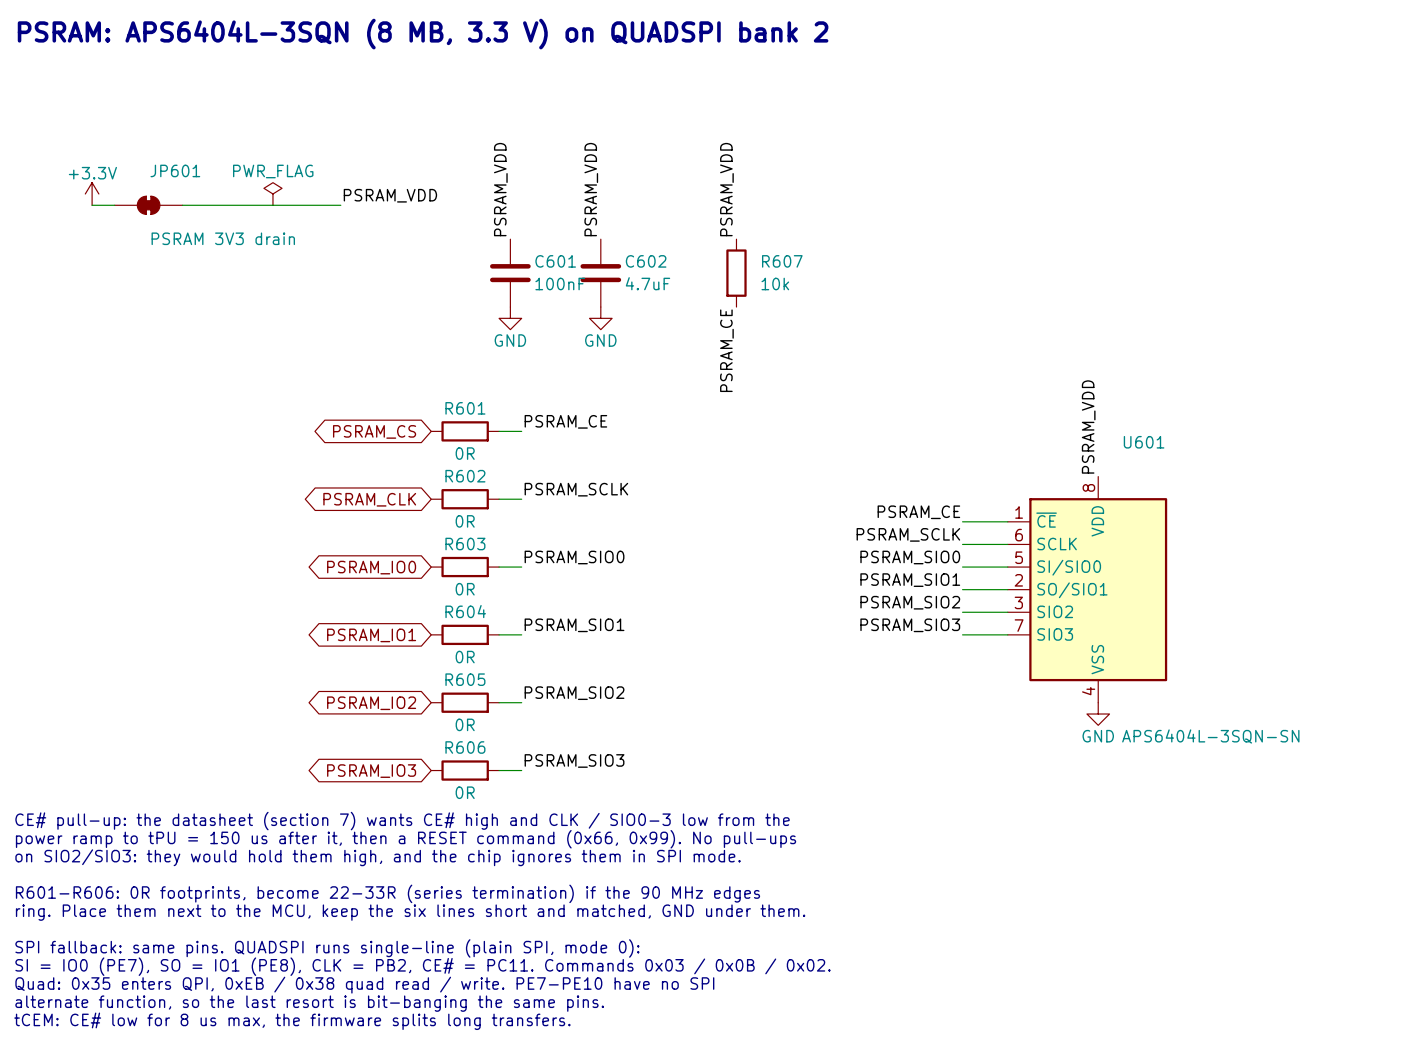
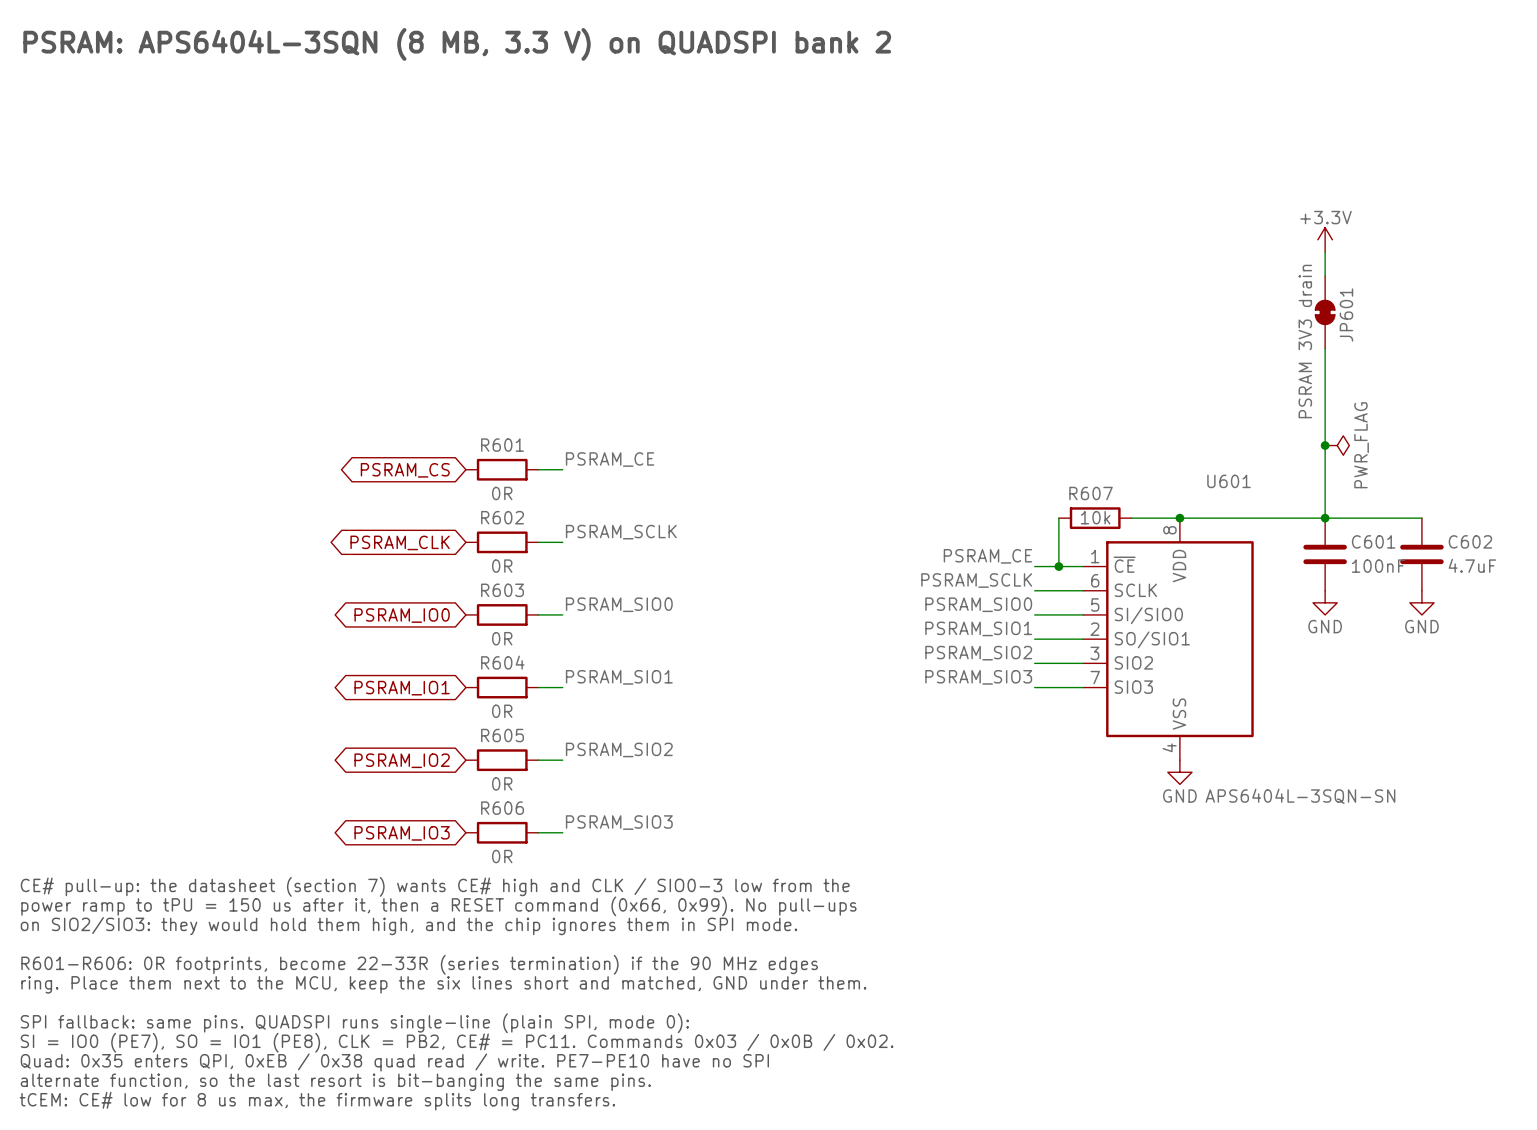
JP601 name position: JP601 (175, 170) -> JP601 (1346, 314)
label: PSRAM_VDD (500, 189) -> none
label: PSRAM_VDD (591, 189) -> none
label: PSRAM_VDD (726, 189) -> none
power symbol: +3.3V (92, 193) -> none
power symbol: PWR_FLAG (272, 193) -> none
label: PSRAM_VDD (390, 195) -> none
wire: (92, 205) (114, 205) -> none
JP601 rotation: 0° (148, 205) -> 90° clockwise (1325, 312)
JP601 position: (148, 205) -> (1325, 312)
wire: (182, 205) (340, 205) -> none
power symbol: none -> +3.3V (1325, 239)
wire: none -> (1325, 251) (1325, 276)
JP601 value position: PSRAM 3V3 drain (223, 238) -> PSRAM 3V3 drain (1305, 341)
R607 name position: R607 (782, 261) -> R607 (1091, 493)
C601 position: (510, 273) -> (1325, 554)
C602 position: (600, 273) -> (1421, 554)
R607 rotation: 0° (736, 273) -> 90° clockwise (1095, 518)
R607 position: (736, 273) -> (1095, 518)
R607 value position: 10k (775, 284) -> 10k (1095, 517)
power symbol: GND (510, 318) -> none
power symbol: GND (600, 318) -> none
wire: none -> (1325, 348) (1325, 518)
label: PSRAM_CE (726, 350) -> none
junction: none -> (1325, 445)
power symbol: none -> PWR_FLAG (1337, 445)
label: PSRAM_VDD (1088, 426) -> none
wire: none -> (1058, 518) (1058, 566)
wire: none -> (1131, 518) (1421, 518)
junction: none -> (1179, 518)
junction: none -> (1325, 518)
junction: none -> (1058, 566)
power symbol: none -> GND (1325, 602)
power symbol: none -> GND (1421, 602)

